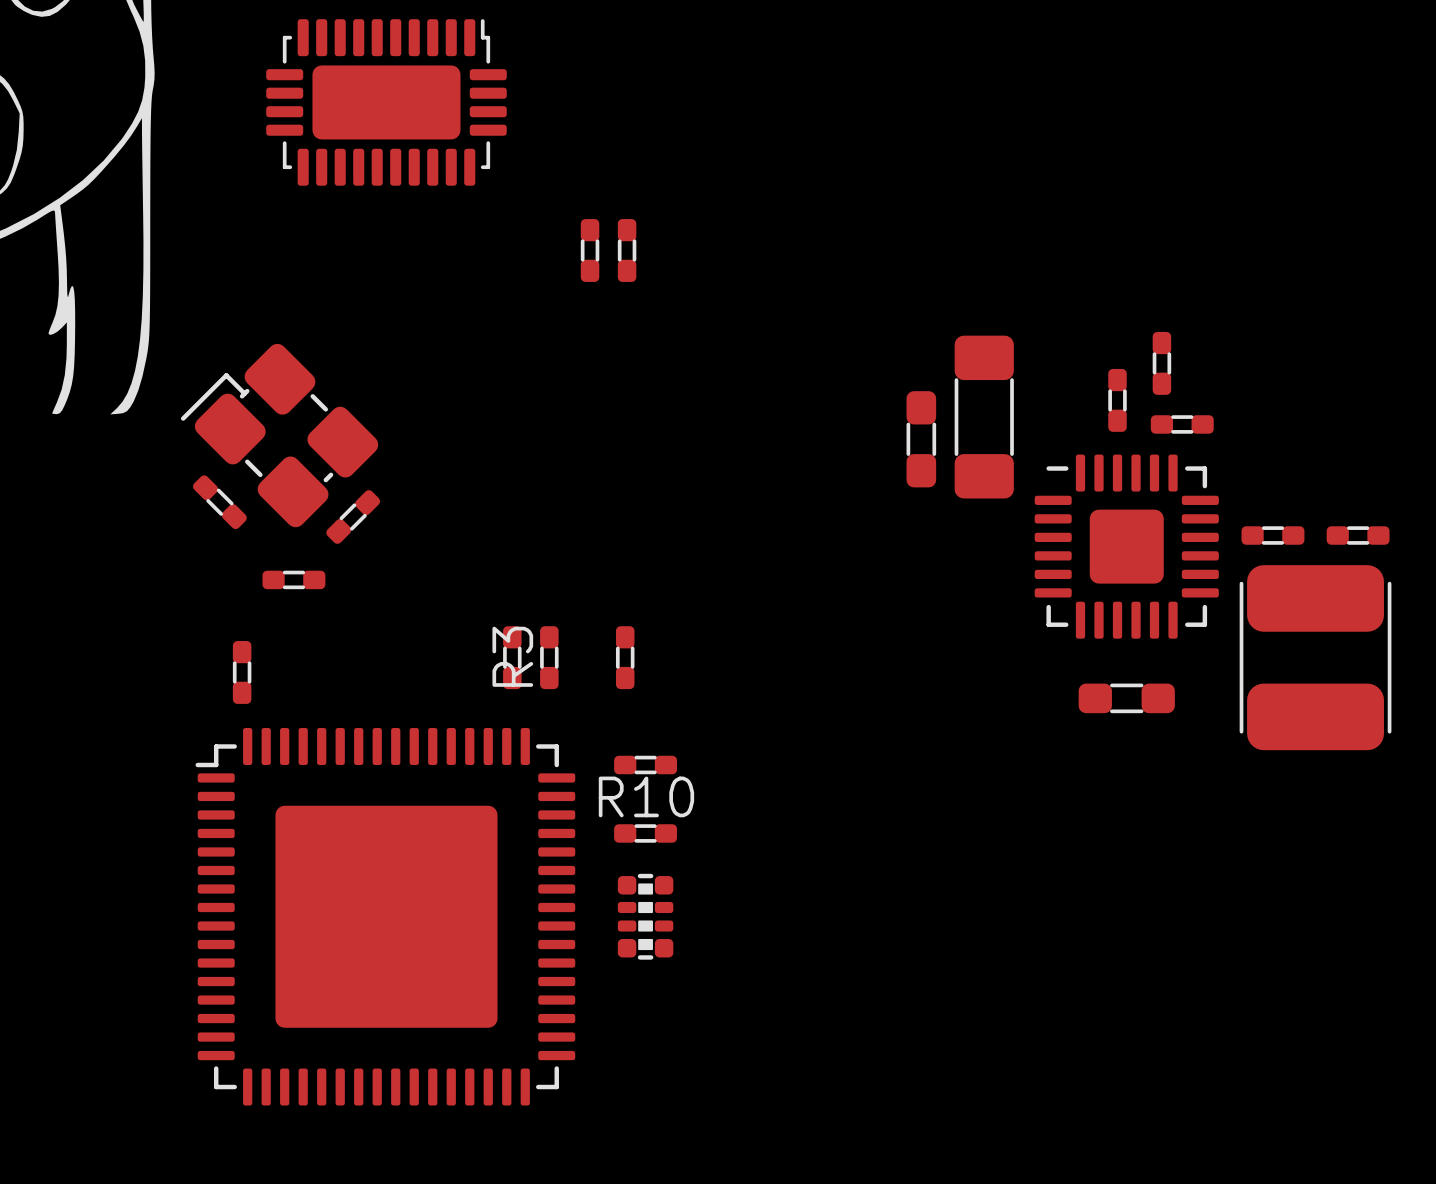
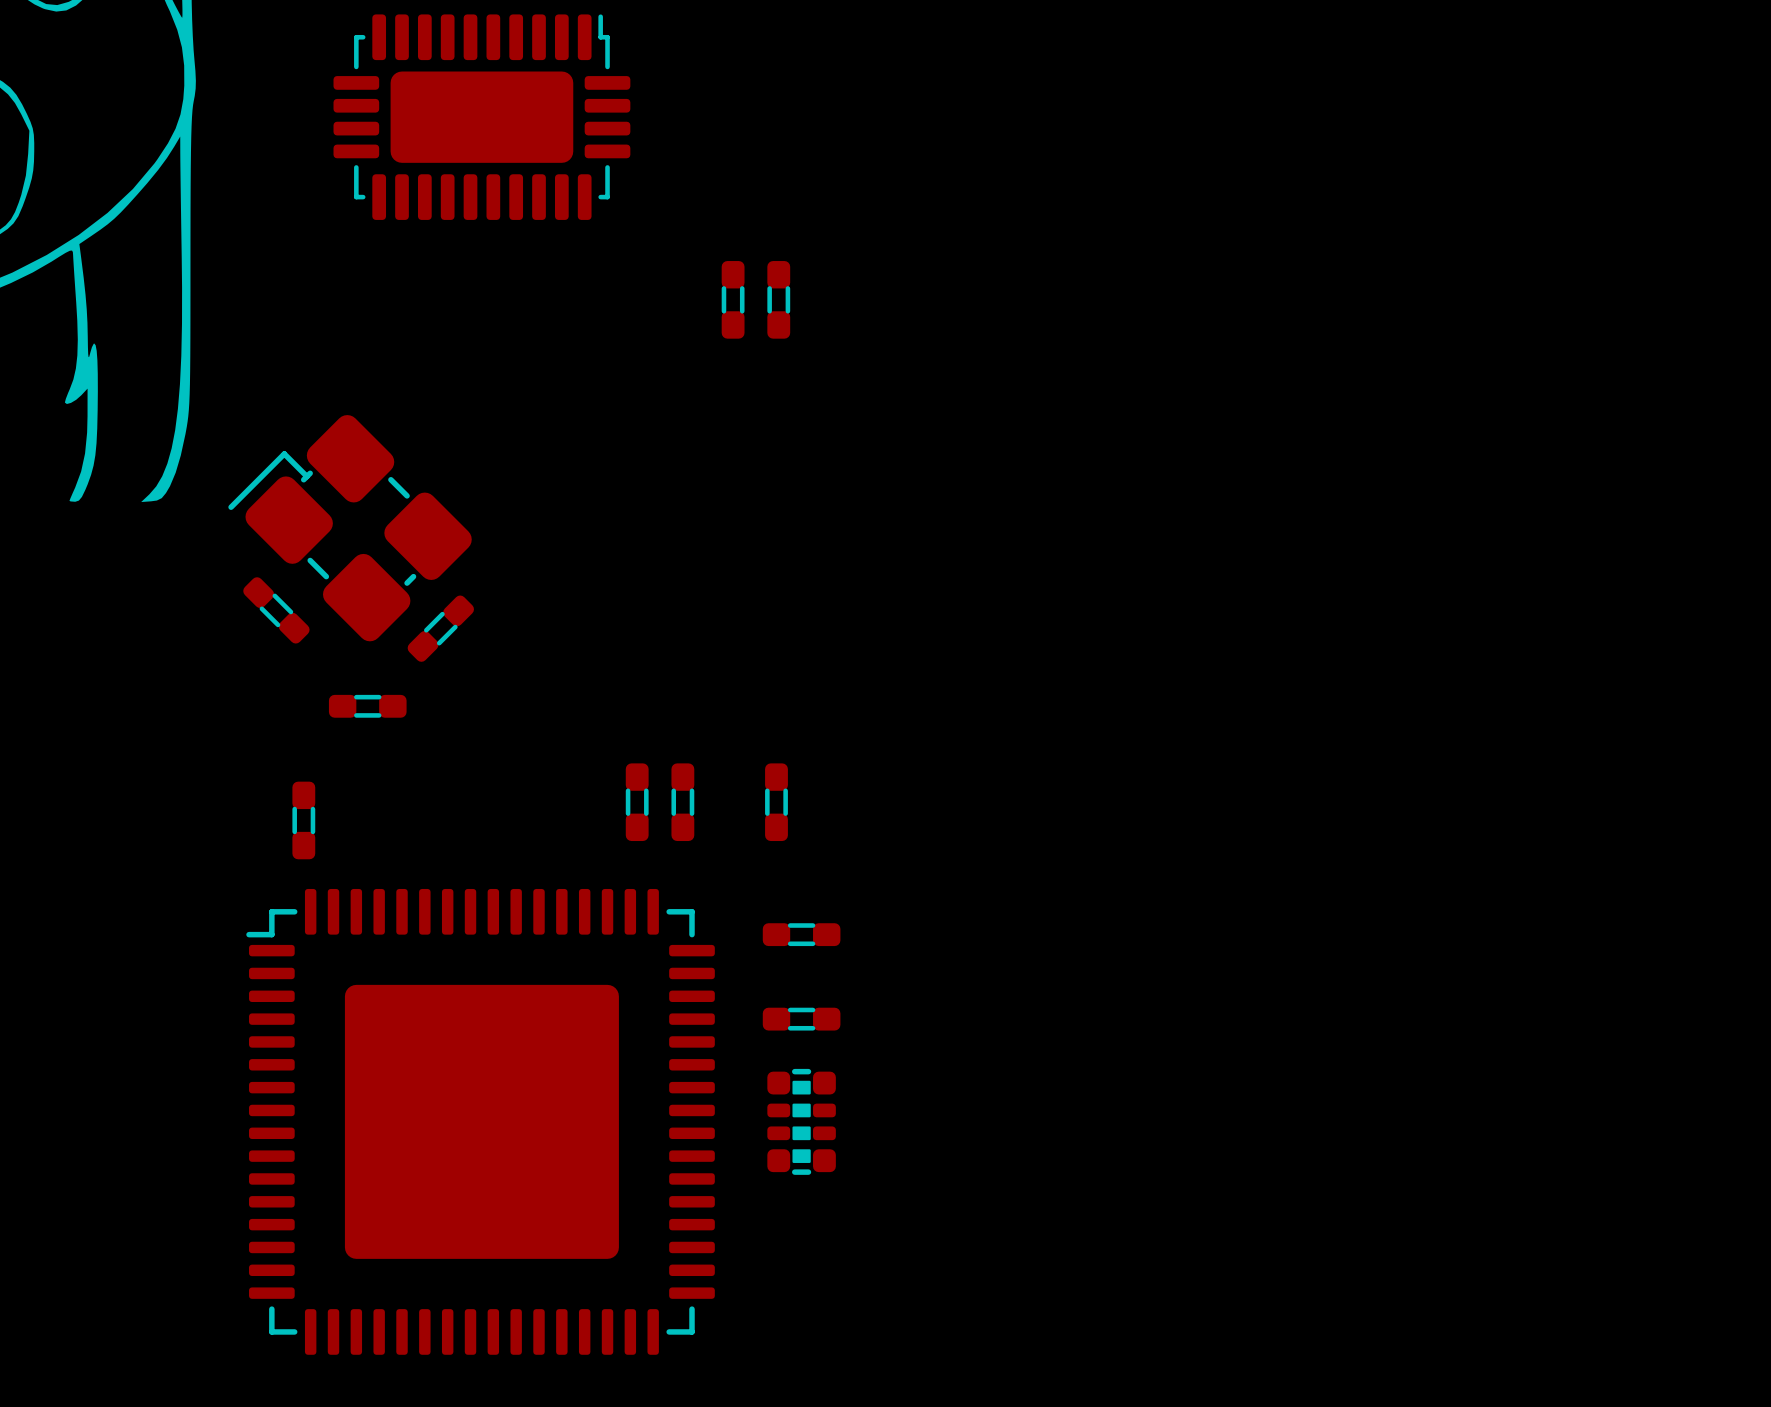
part: (1161, 363) -> none
part: (1117, 400) -> none
part: (984, 417) -> none
part: (1182, 424) -> none
part: (921, 439) -> none
part: (1272, 535) -> none
part: (1358, 535) -> none
part: (1126, 546) -> none
R3 name: R3 (512, 656) -> none
part: (1315, 657) -> none
part: (1126, 698) -> none
R10 name: R10 (646, 796) -> none

